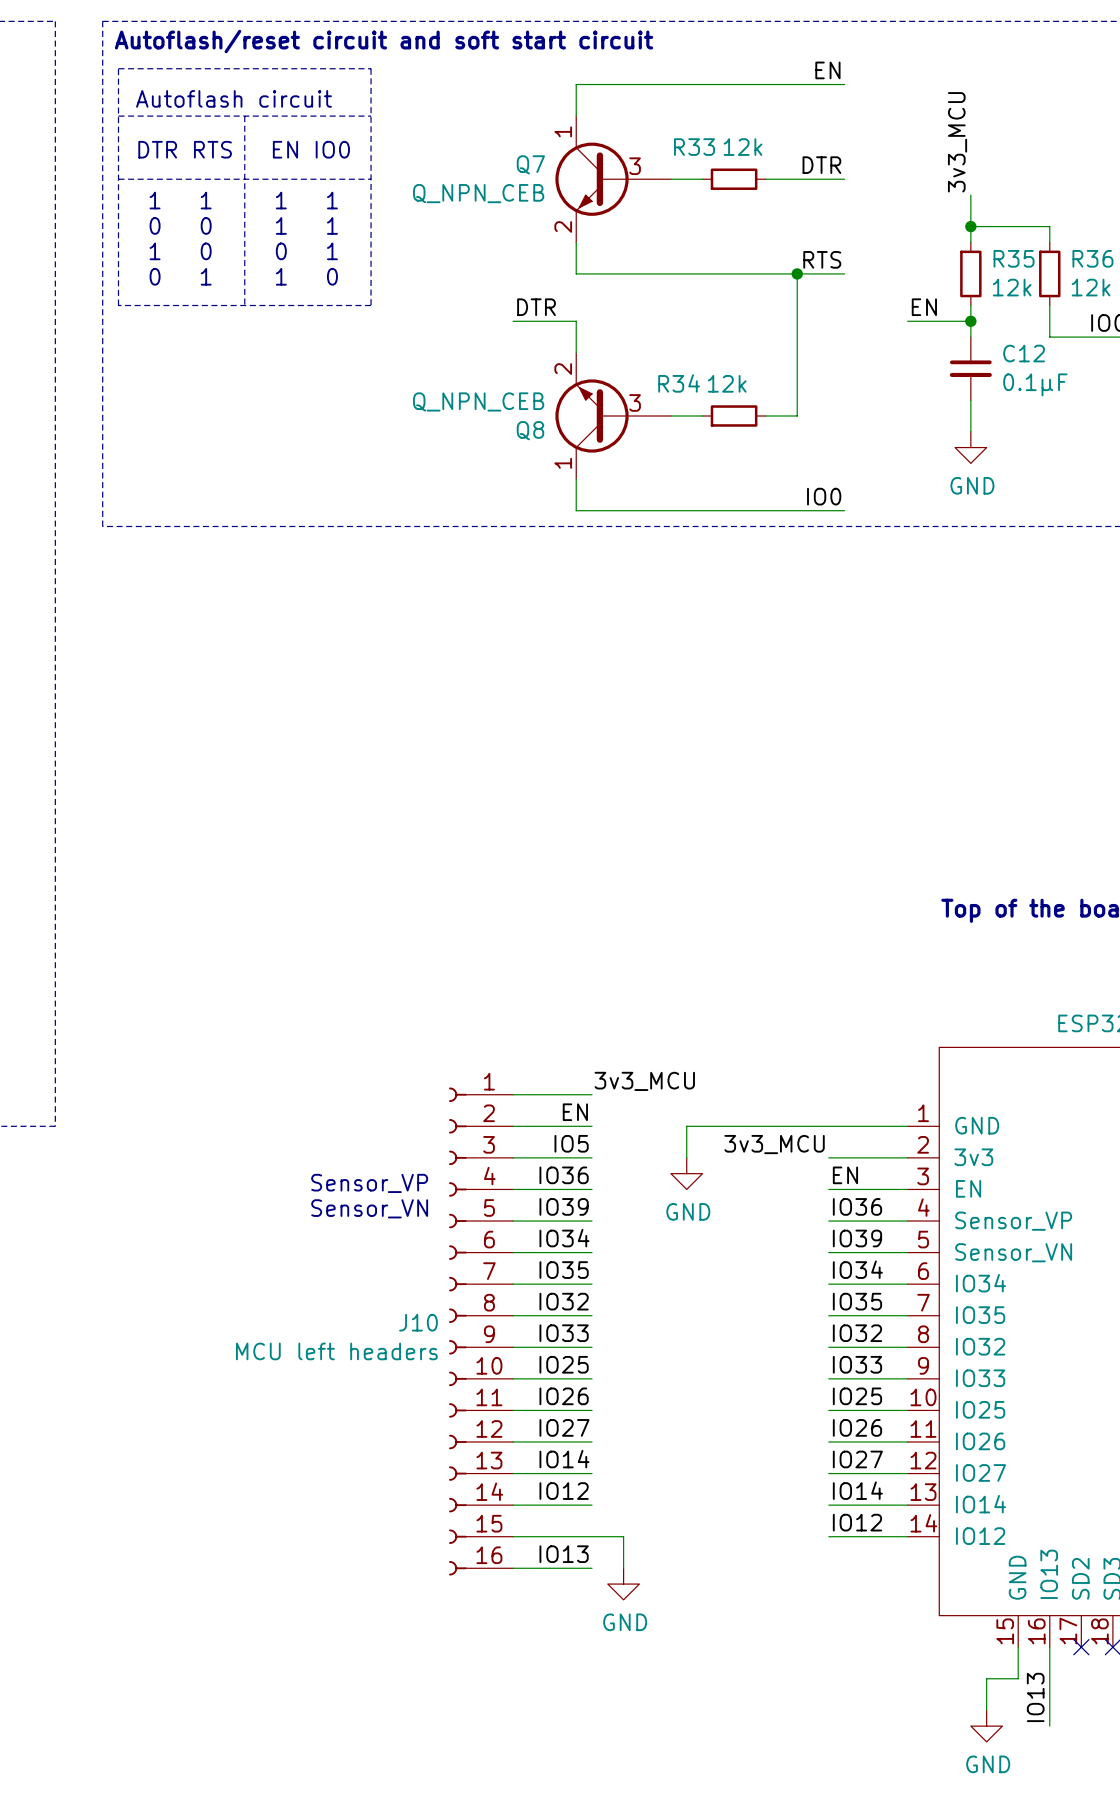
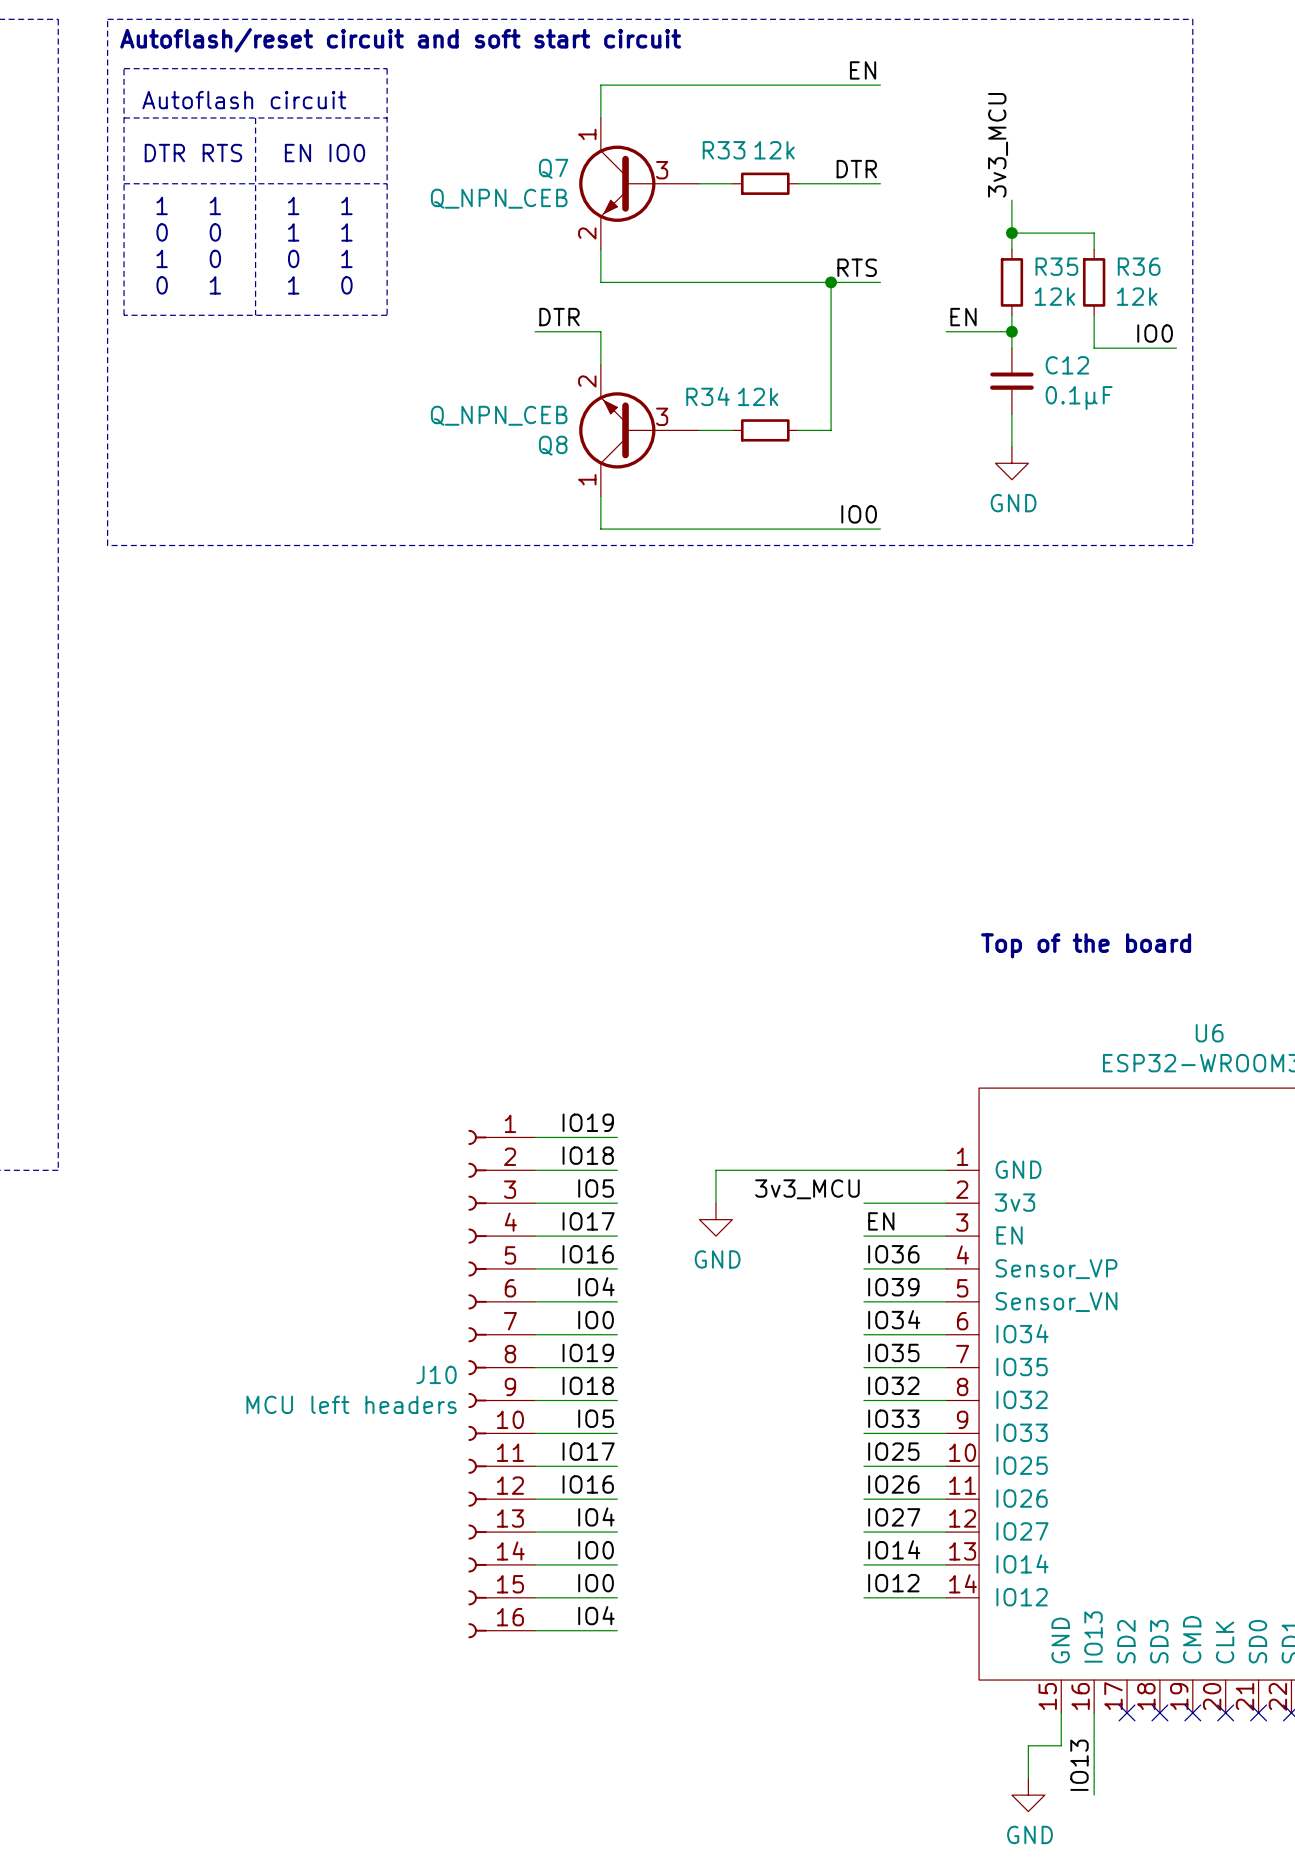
label: 3v3_MCU (644, 1081) -> IO19 (588, 1122)
label: EN (575, 1112) -> IO18 (588, 1155)
label: IO36 (564, 1175) -> IO17 (588, 1221)
text: Sensor_VP (369, 1183) -> none
label: IO39 (564, 1206) -> IO16 (588, 1254)
text: Sensor_VN (369, 1208) -> none
label: IO34 (564, 1238) -> IO4 (596, 1286)
label: IO35 (564, 1270) -> IO0 (596, 1320)
label: IO32 (564, 1301) -> IO19 (588, 1352)
label: IO33 (564, 1333) -> IO18 (588, 1385)
label: IO25 (564, 1364) -> IO5 (596, 1418)
label: IO26 (564, 1396) -> IO17 (588, 1451)
label: IO27 (564, 1427) -> IO16 (588, 1484)
label: IO14 (564, 1459) -> IO4 (596, 1516)
label: IO12 (564, 1491) -> IO0 (596, 1550)
label: none -> IO0 (596, 1583)
wire: (592, 1536) (623, 1536) (623, 1568) -> none
label: IO13 (564, 1554) -> IO4 (596, 1615)
power symbol: GND (623, 1584) -> none

